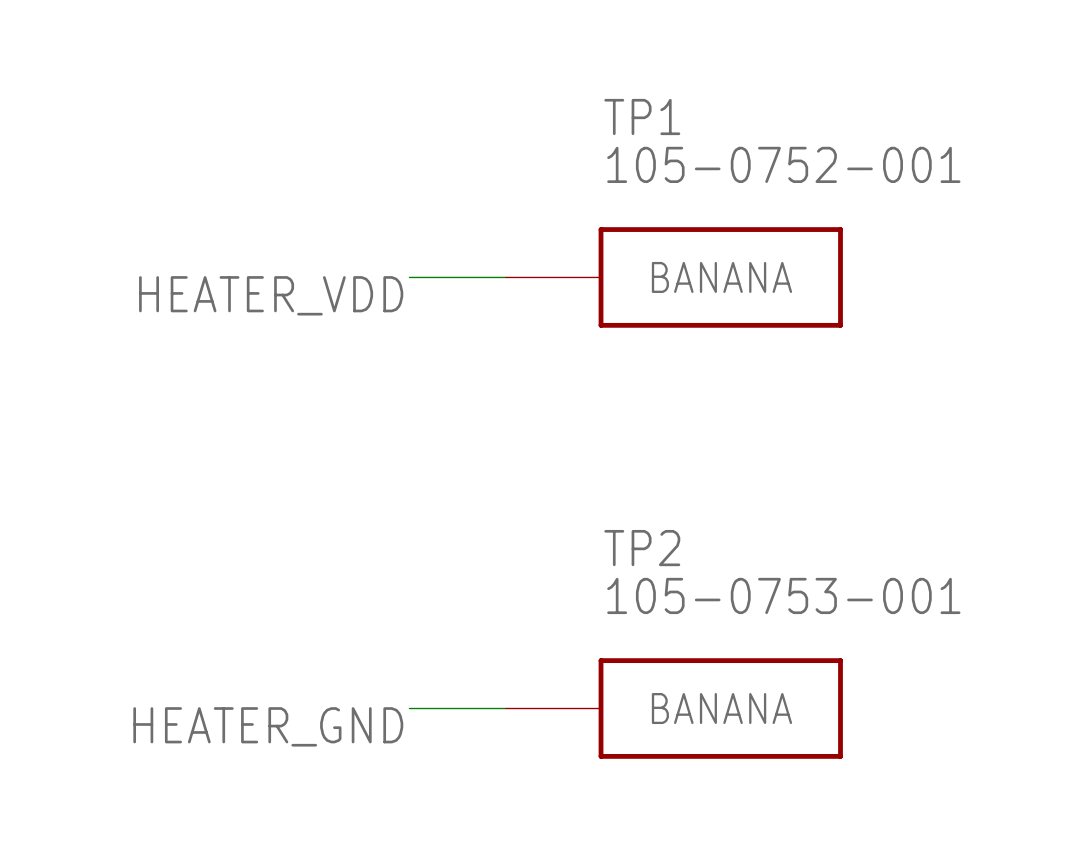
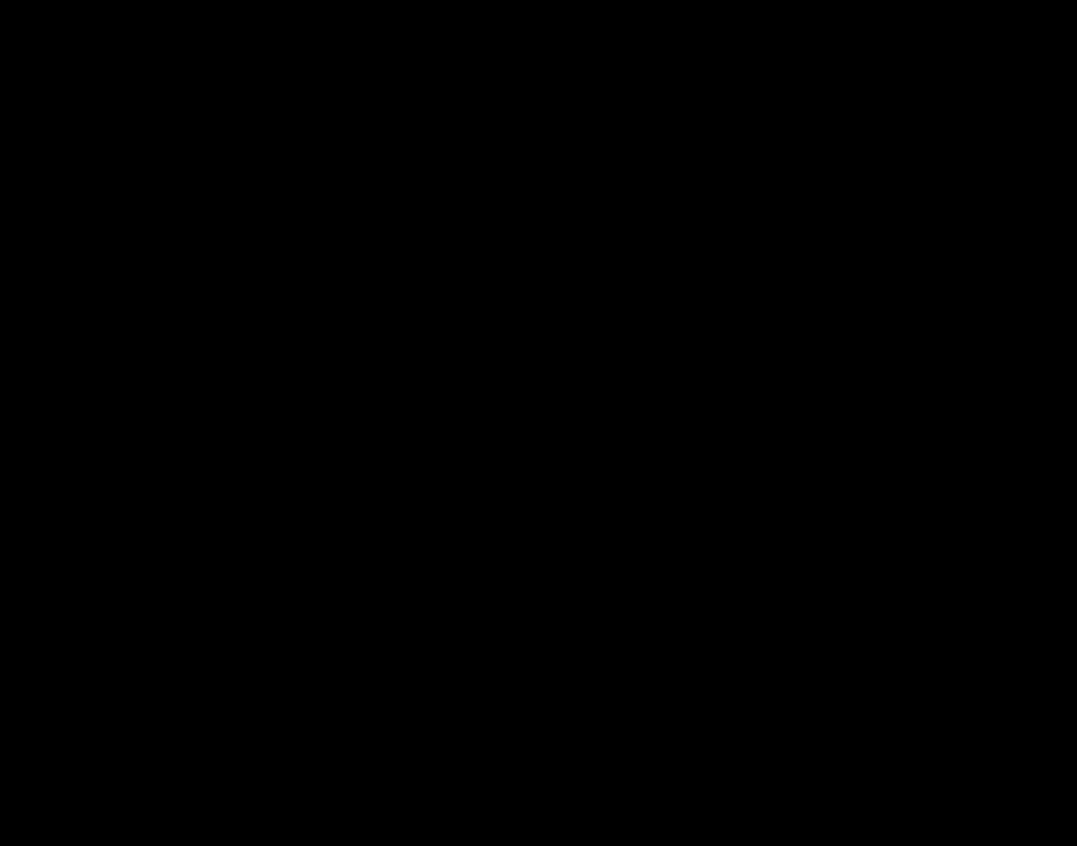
wire: (409, 277) (505, 277) -> none
TP1: 105-0752-001 (674, 277) -> none
label: HEATER_VDD (271, 295) -> none
wire: (409, 708) (505, 708) -> none
TP2: 105-0753-001 (674, 708) -> none
label: HEATER_GND (268, 726) -> none

